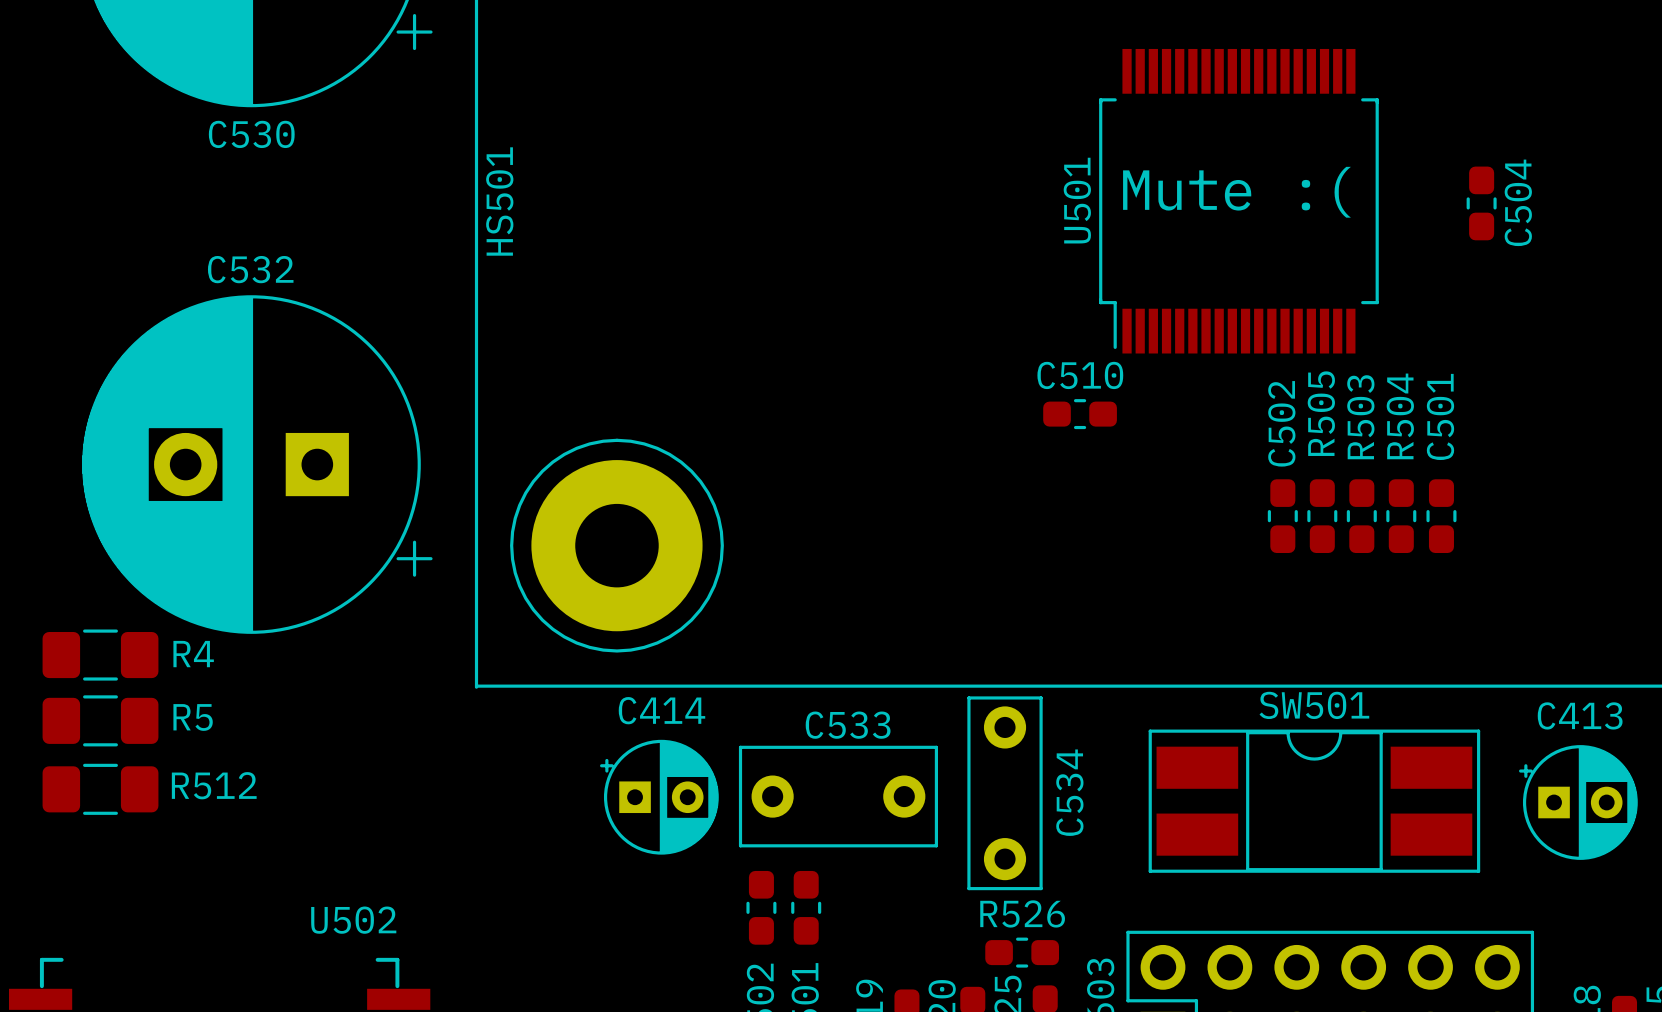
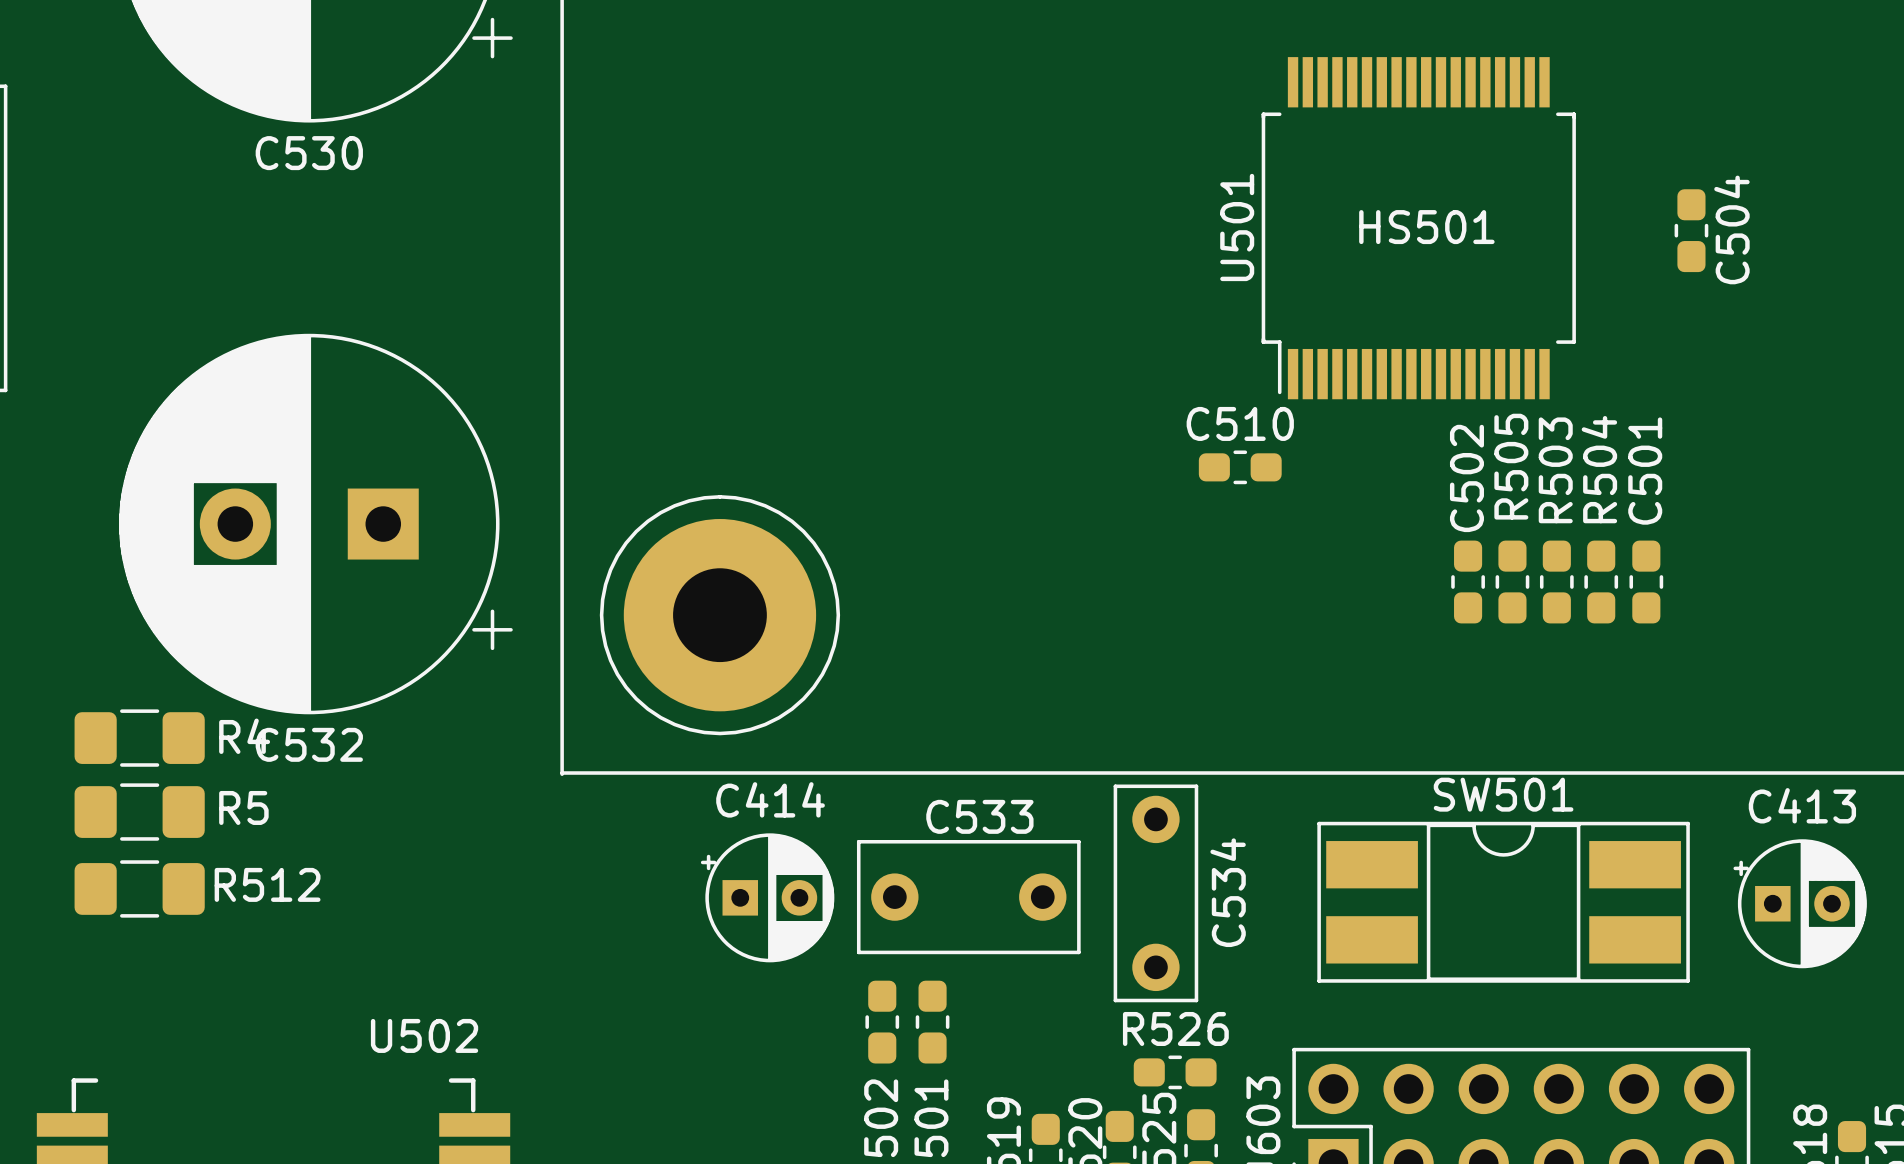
text: Mute :( (1236, 192) -> none
HS501 name rotation: 0° (499, 201) -> 90° clockwise (1426, 227)
HS501 name position: HS501 (499, 201) -> HS501 (1426, 227)
C532 name position: C532 (250, 269) -> C532 (309, 744)

